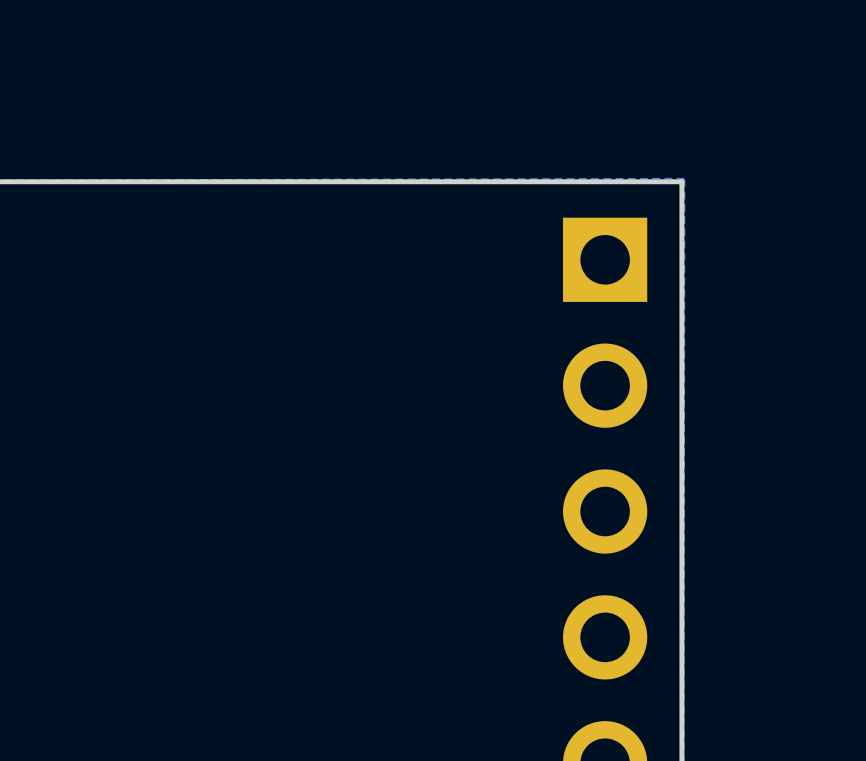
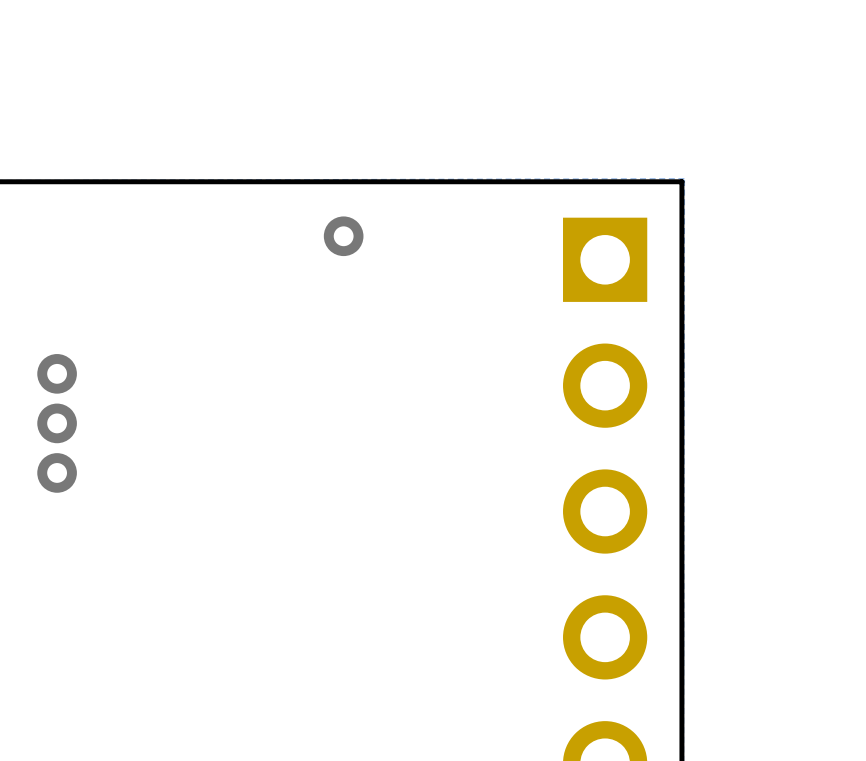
via: none -> (343, 236)
via: none -> (57, 373)
via: none -> (57, 423)
via: none -> (57, 472)

